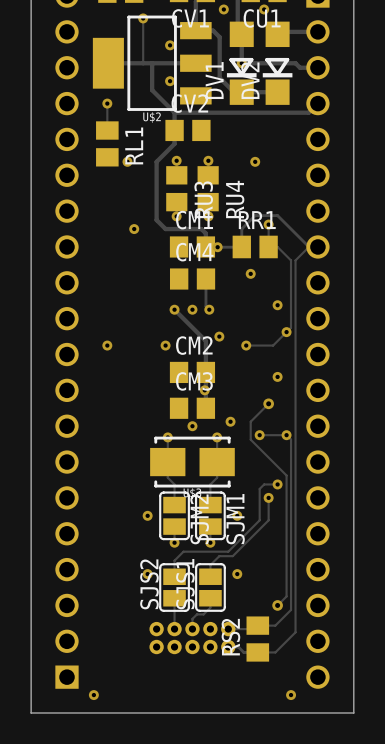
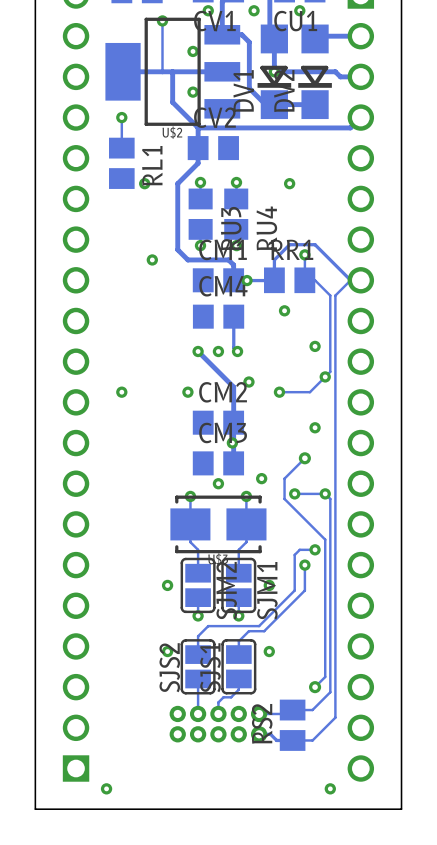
via: none -> (208, 10)

